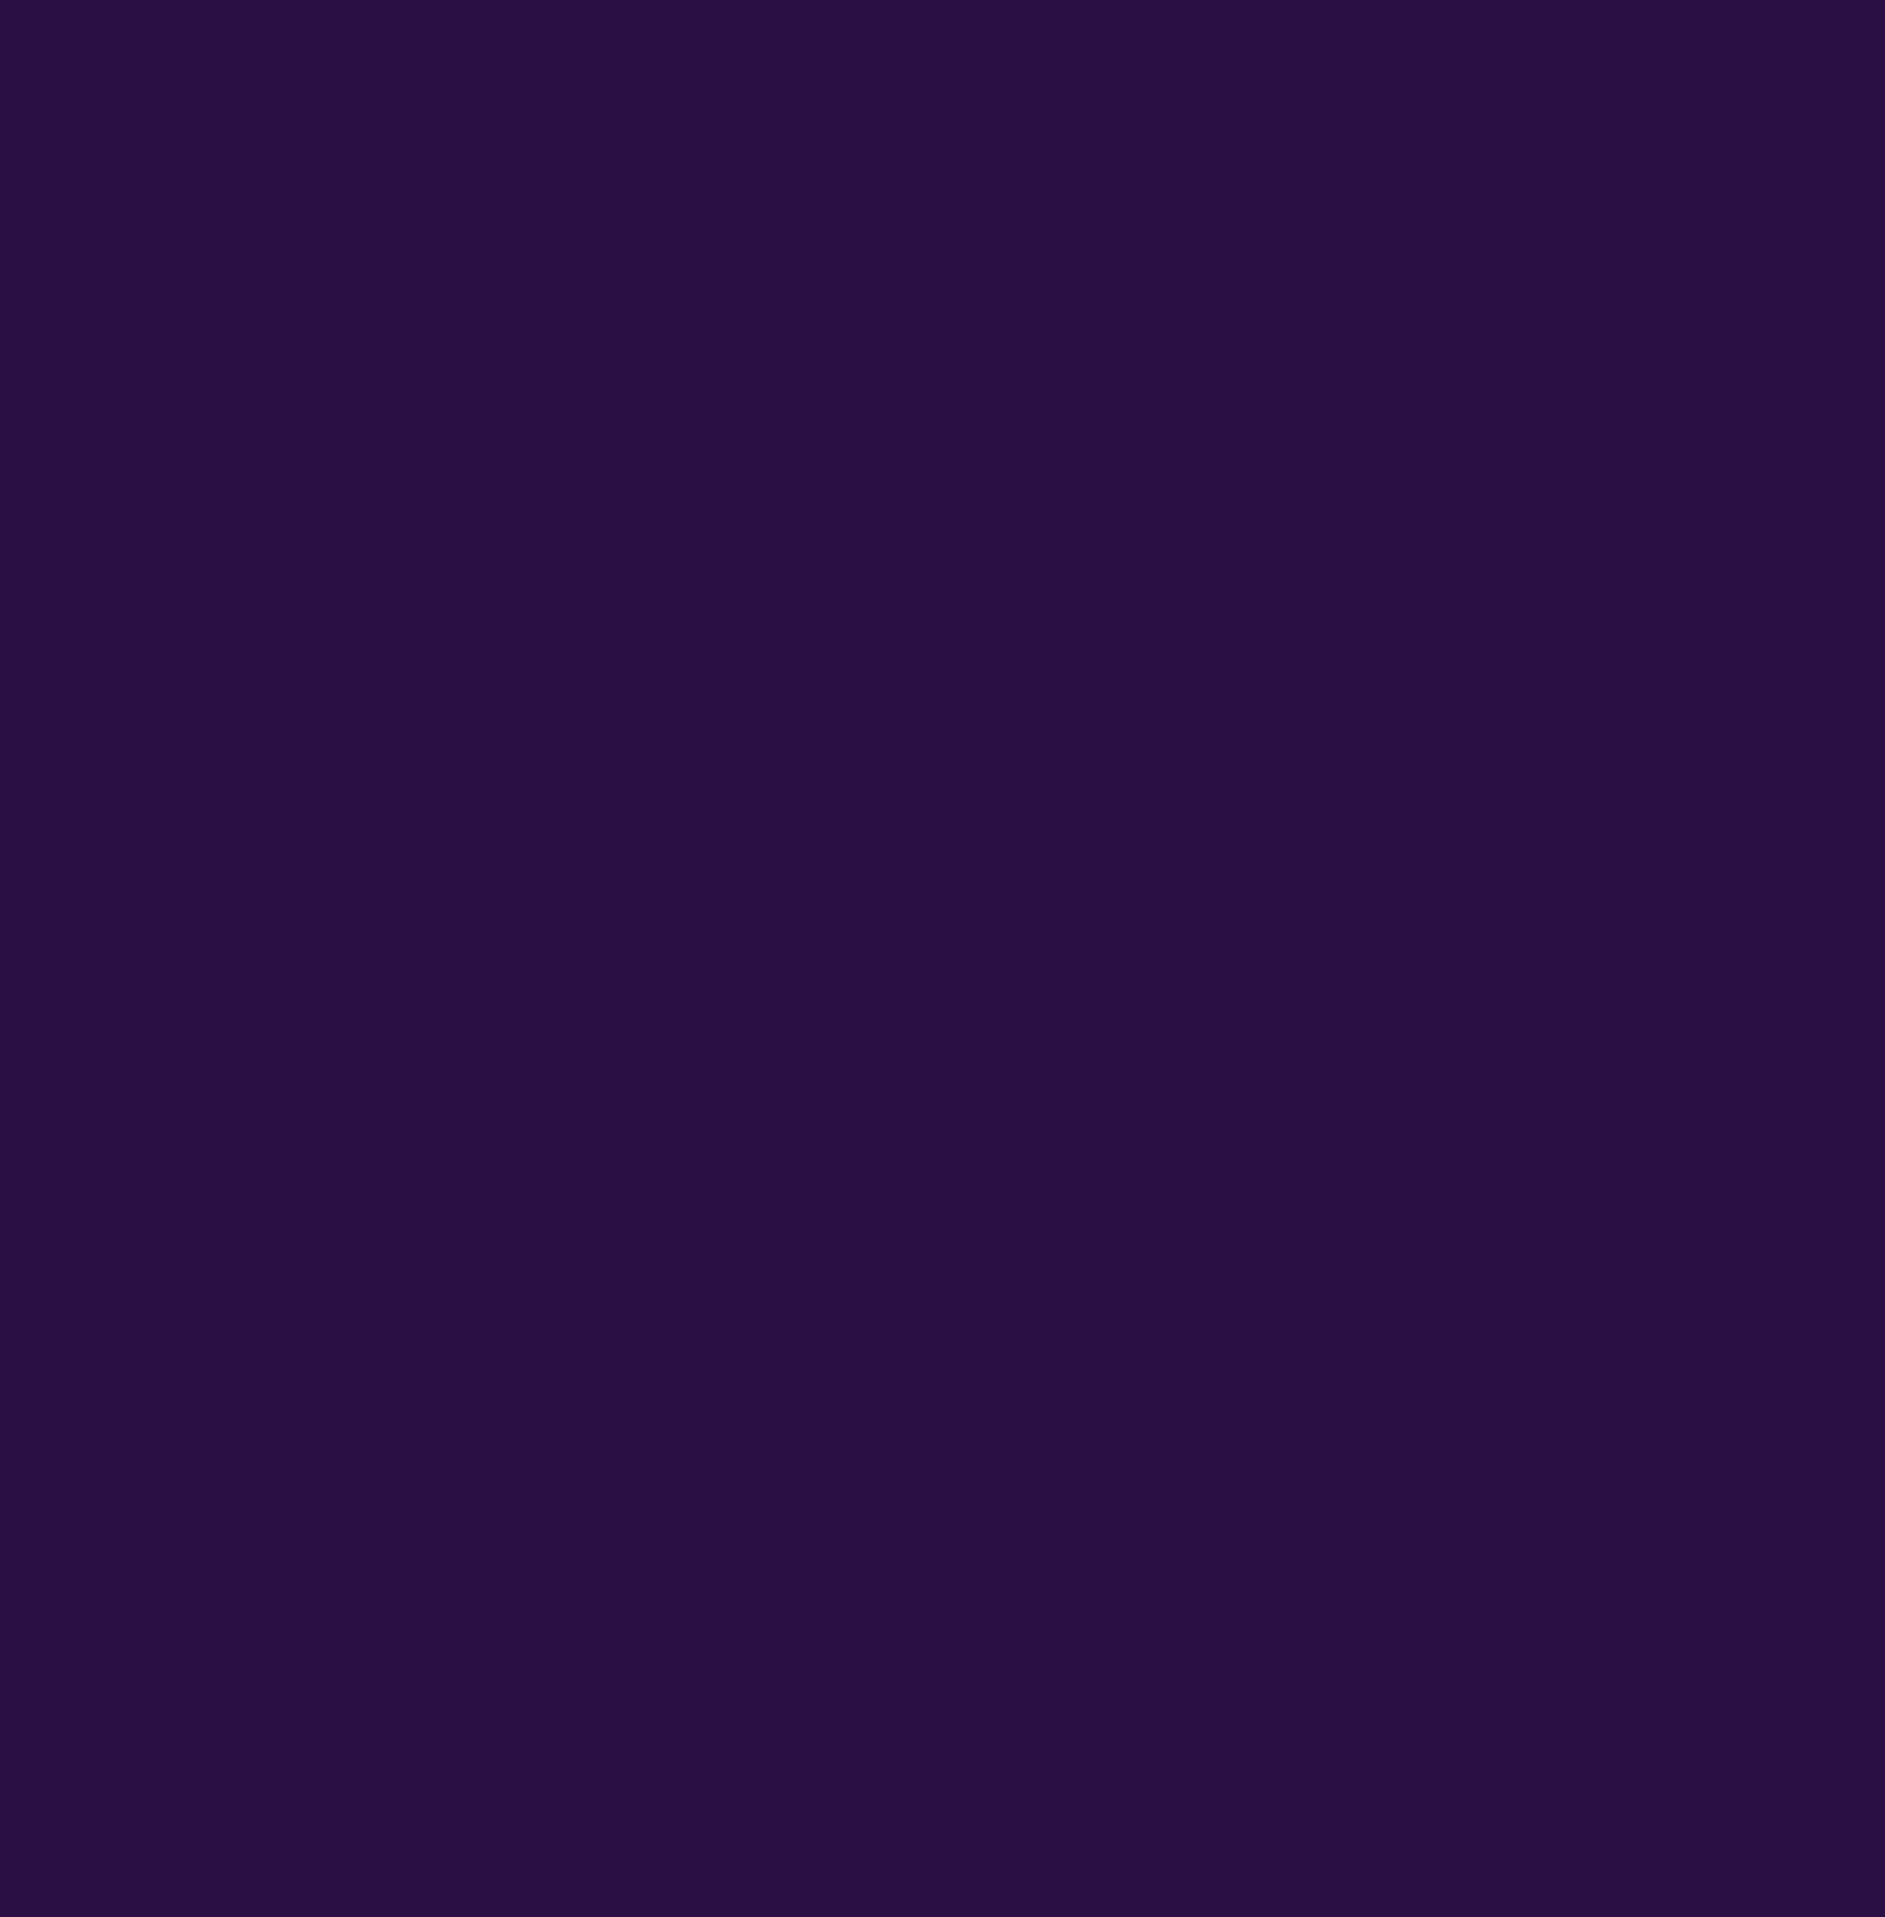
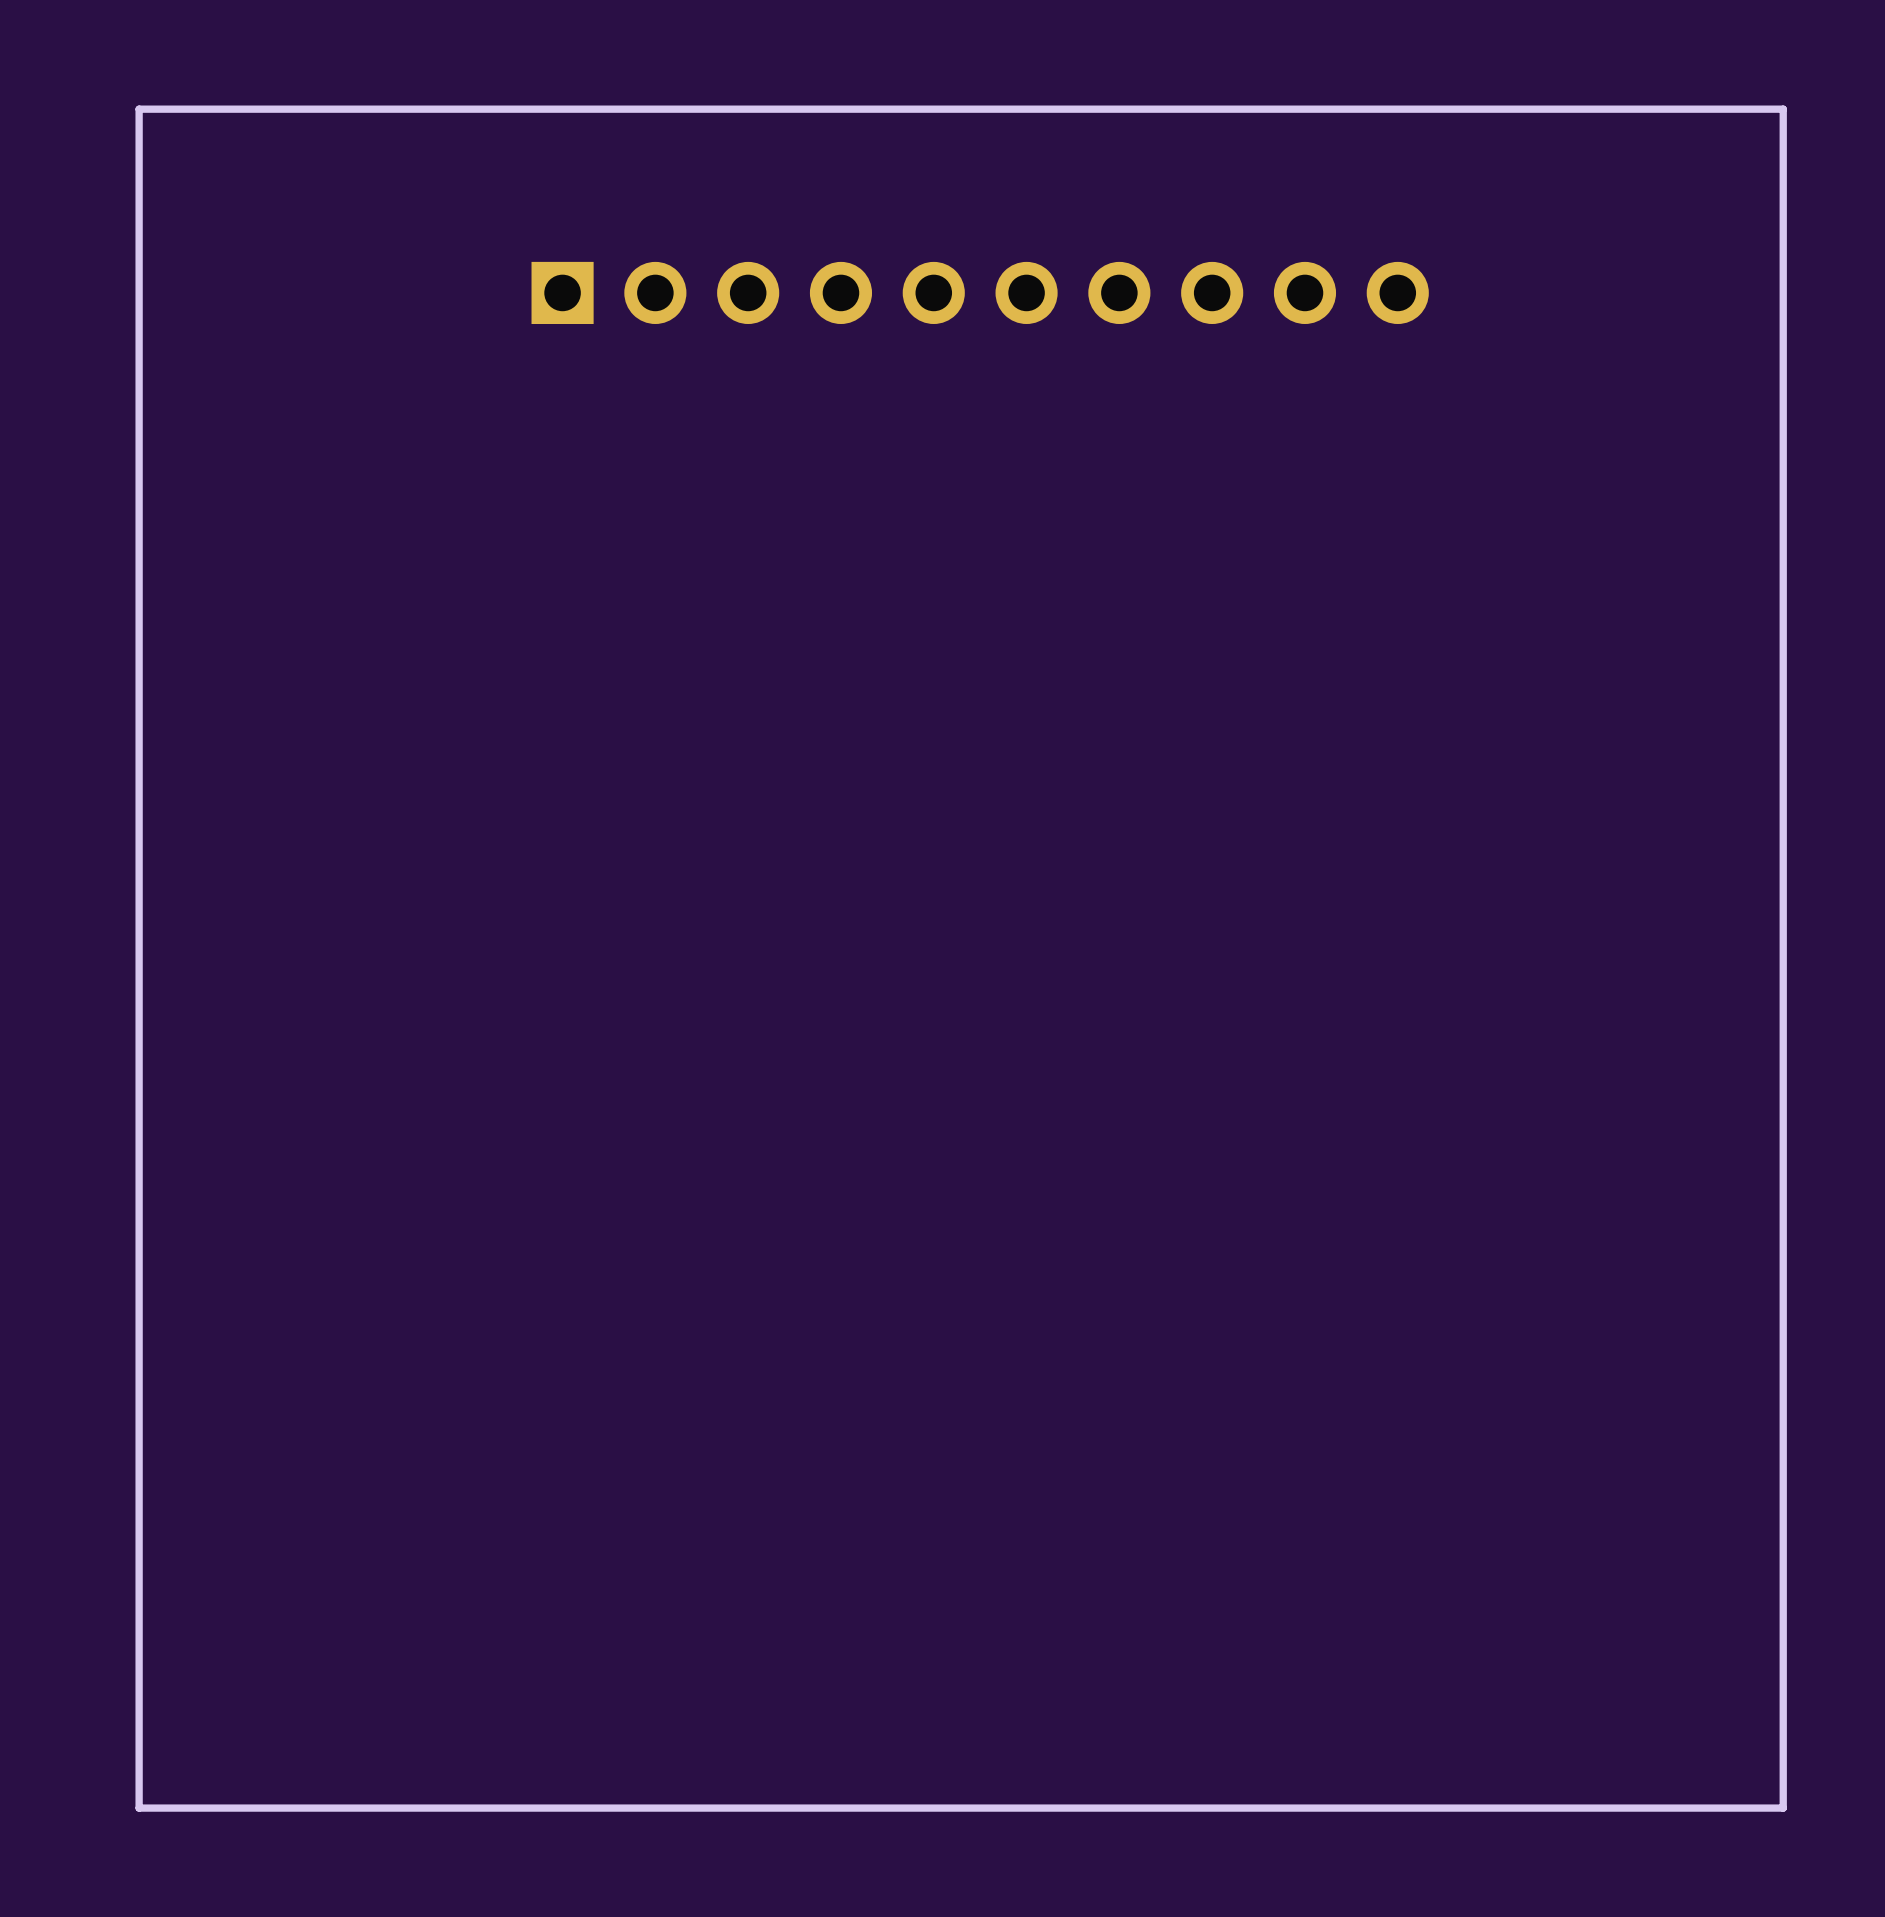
board edge: none -> (1783, 109) (139, 109) (139, 1808) (1783, 1808) (1783, 109)
part: none -> (980, 292)

